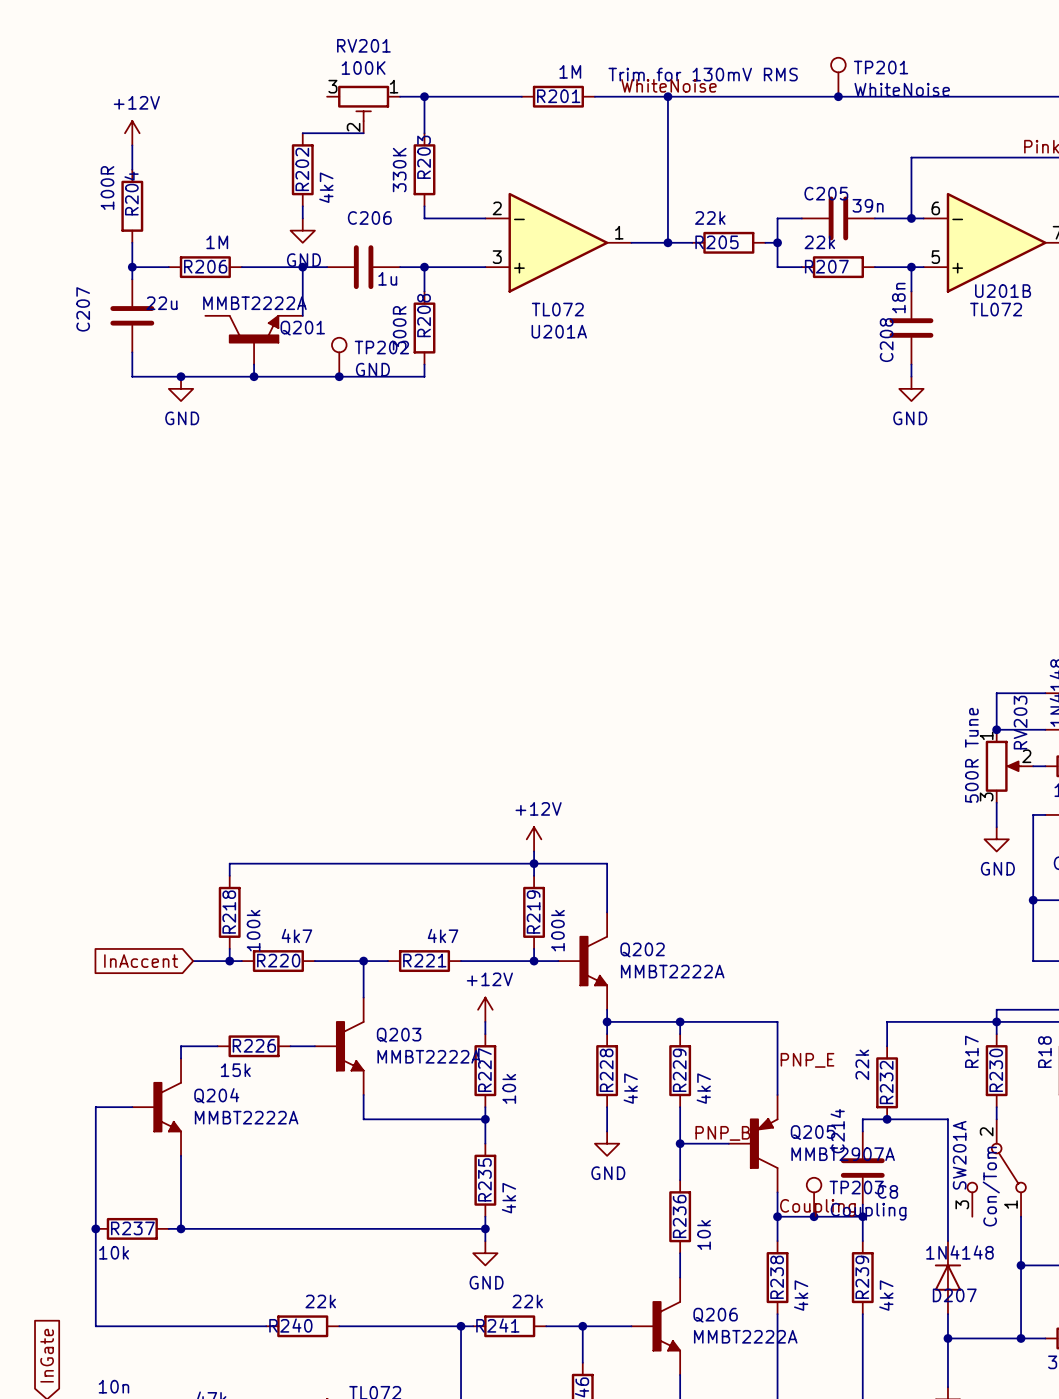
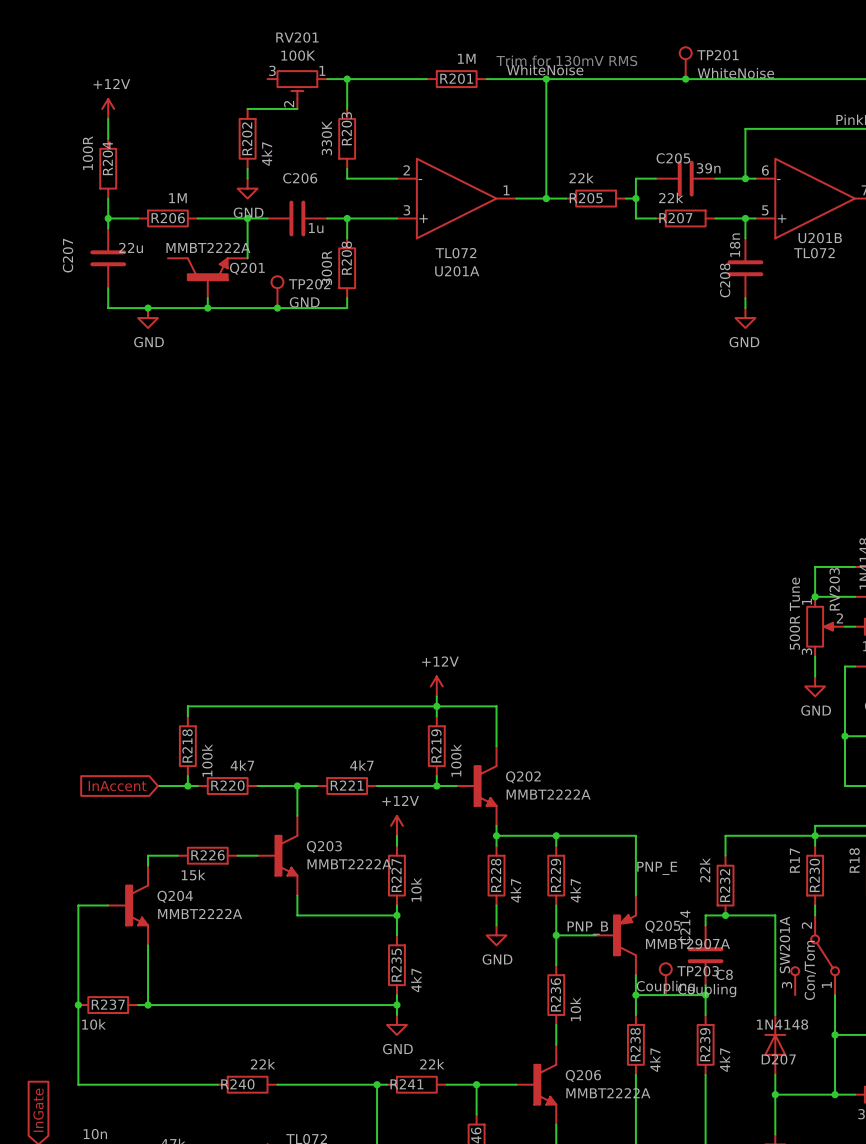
junction: (814, 1216) -> none

